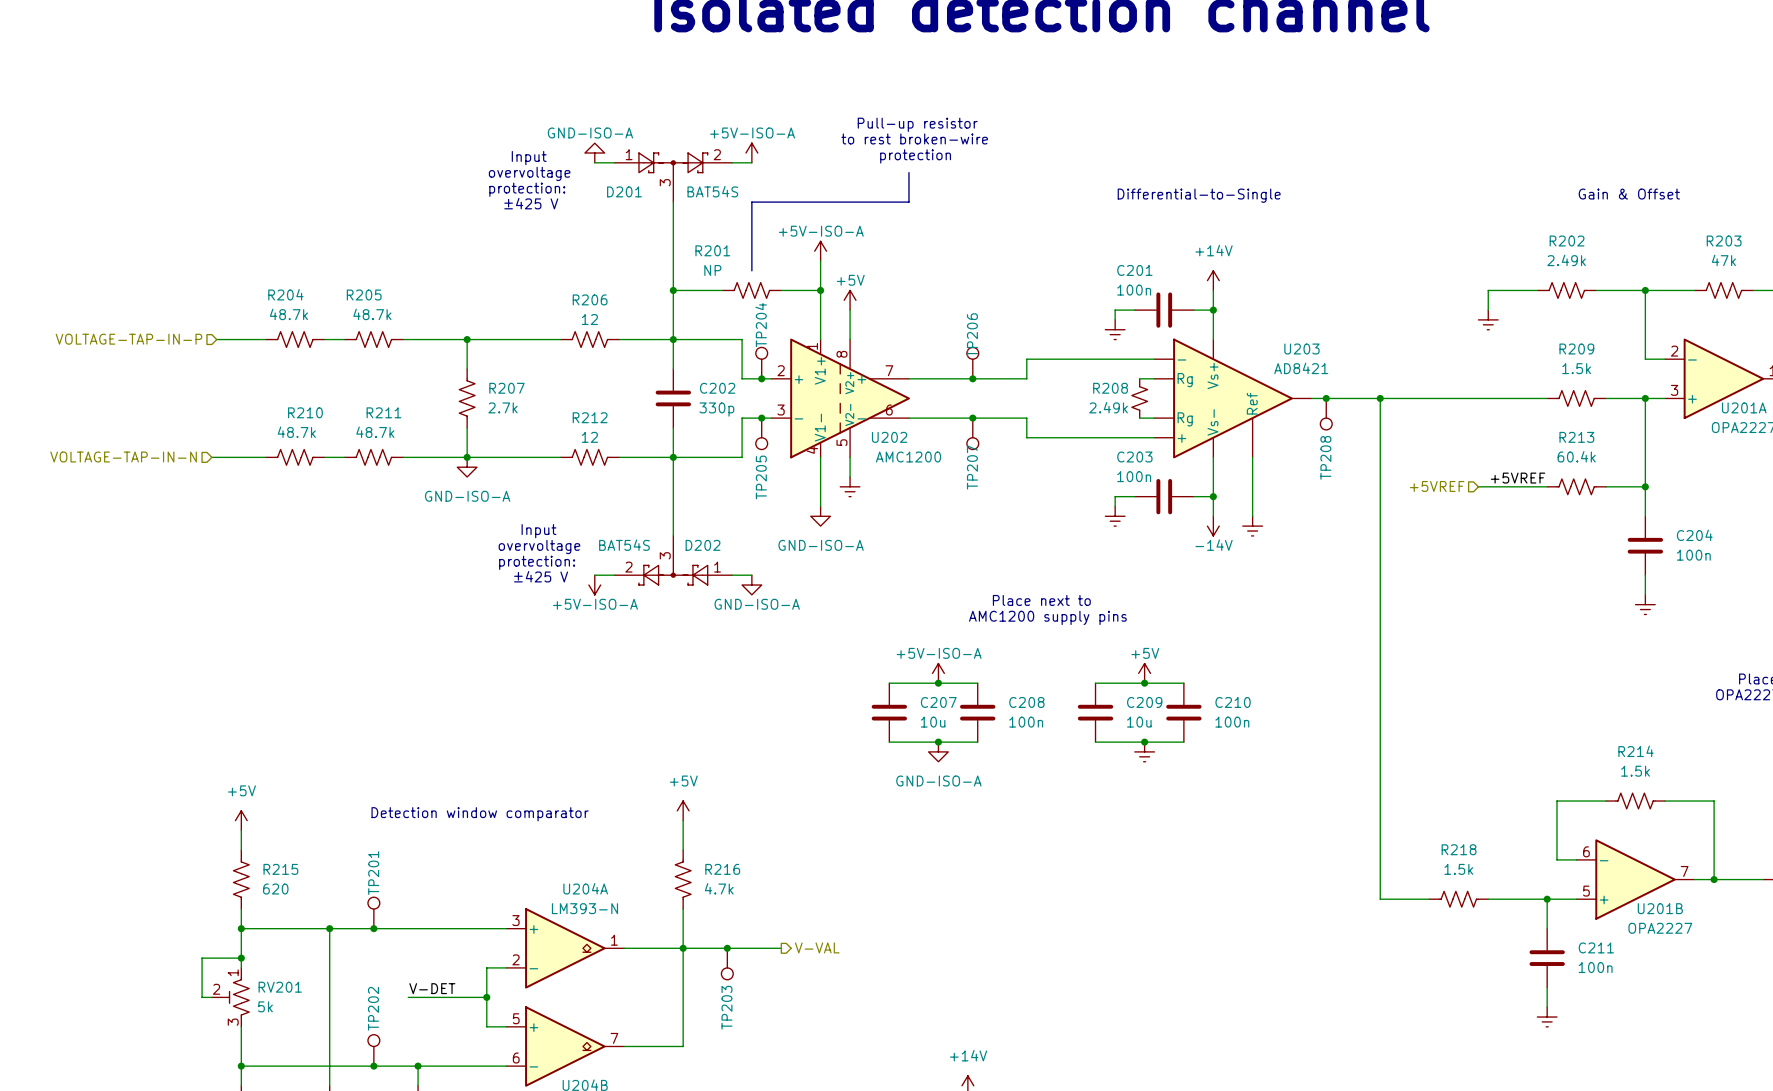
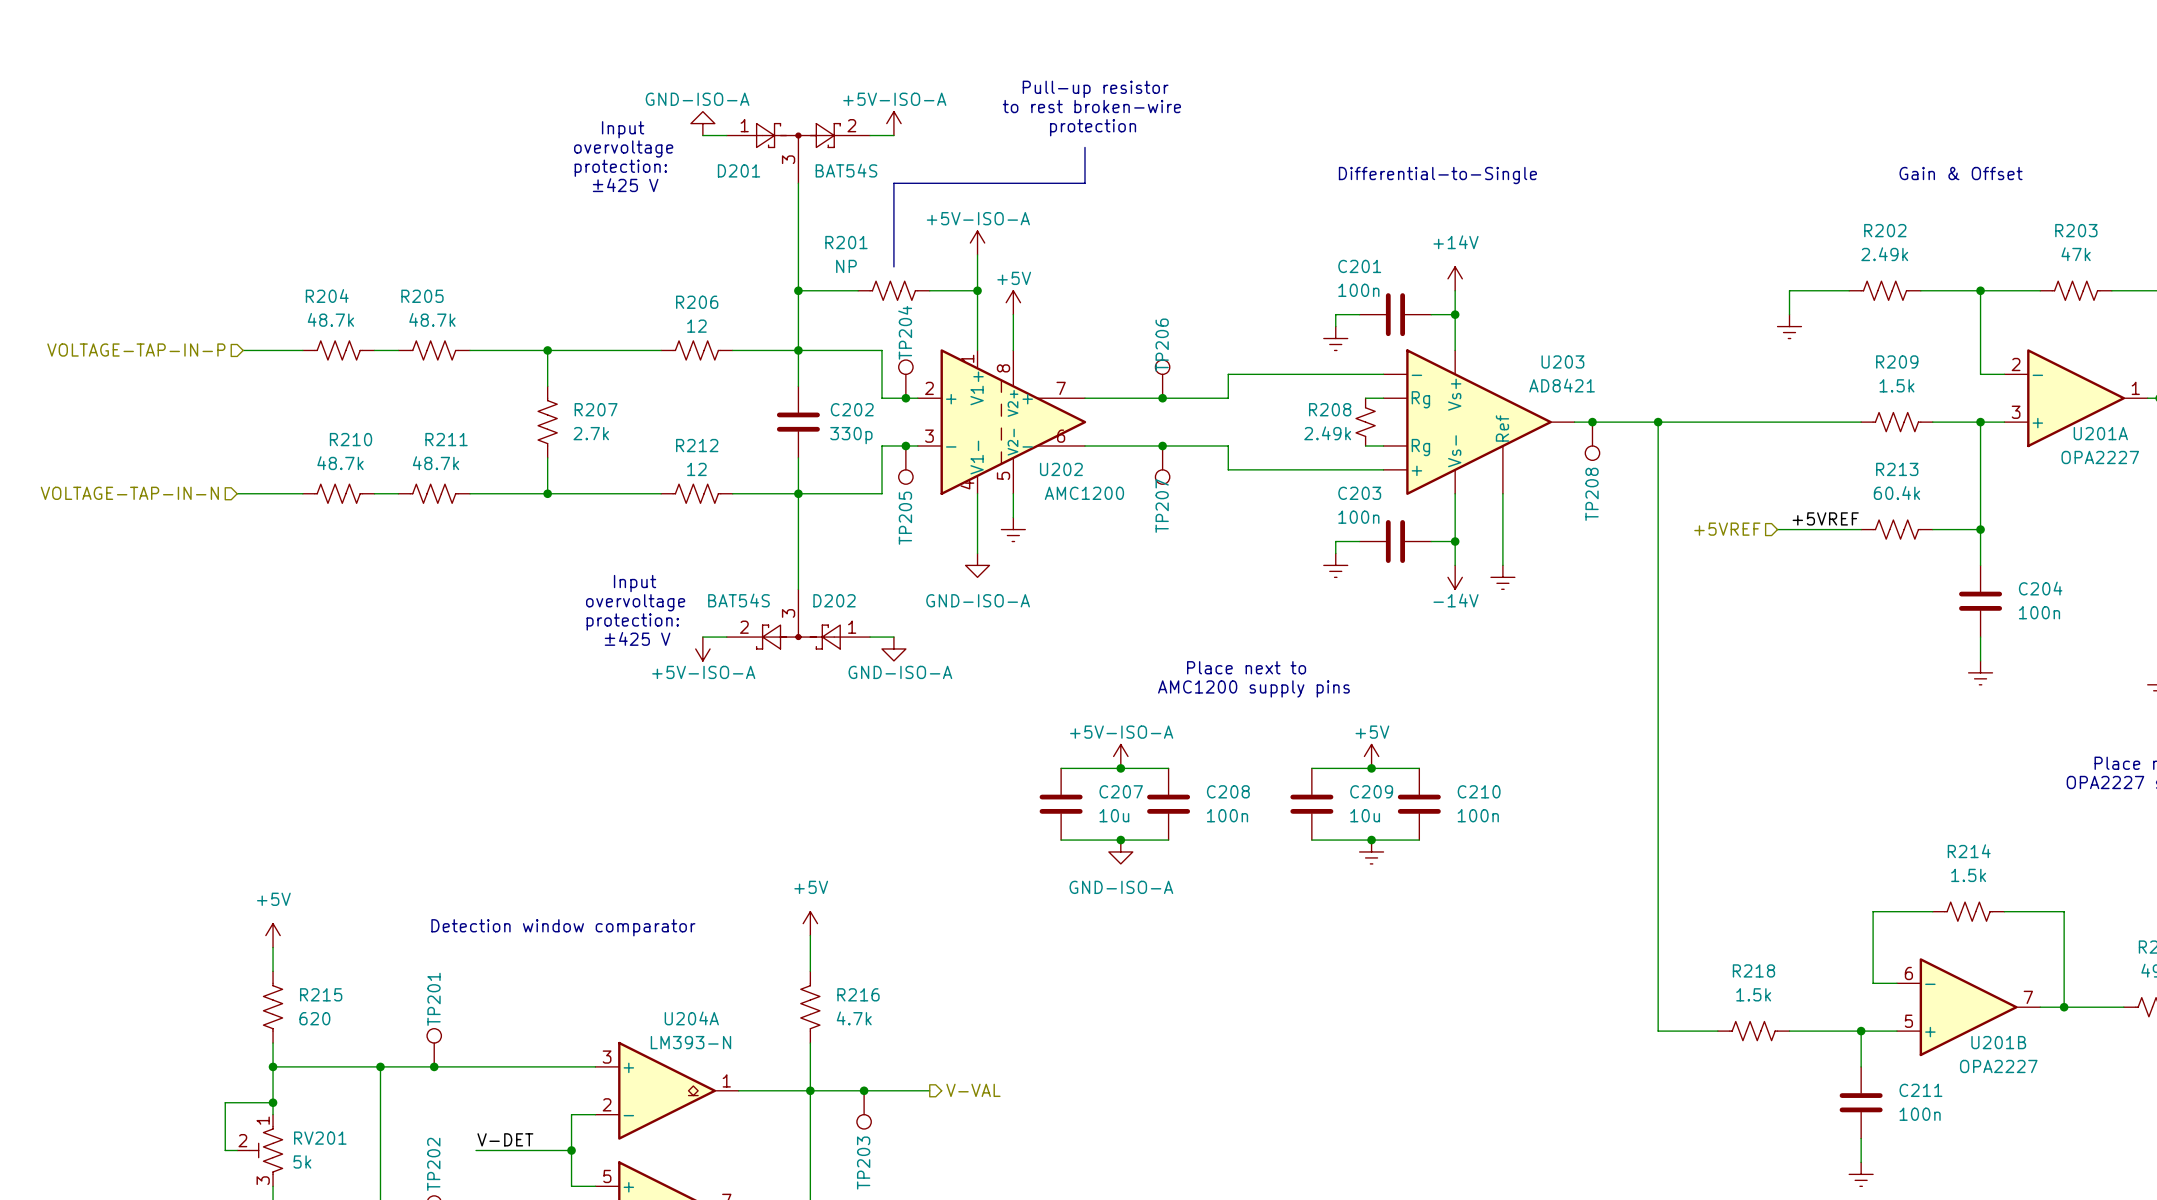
power symbol: GND-ISO-A (467, 467) -> none

